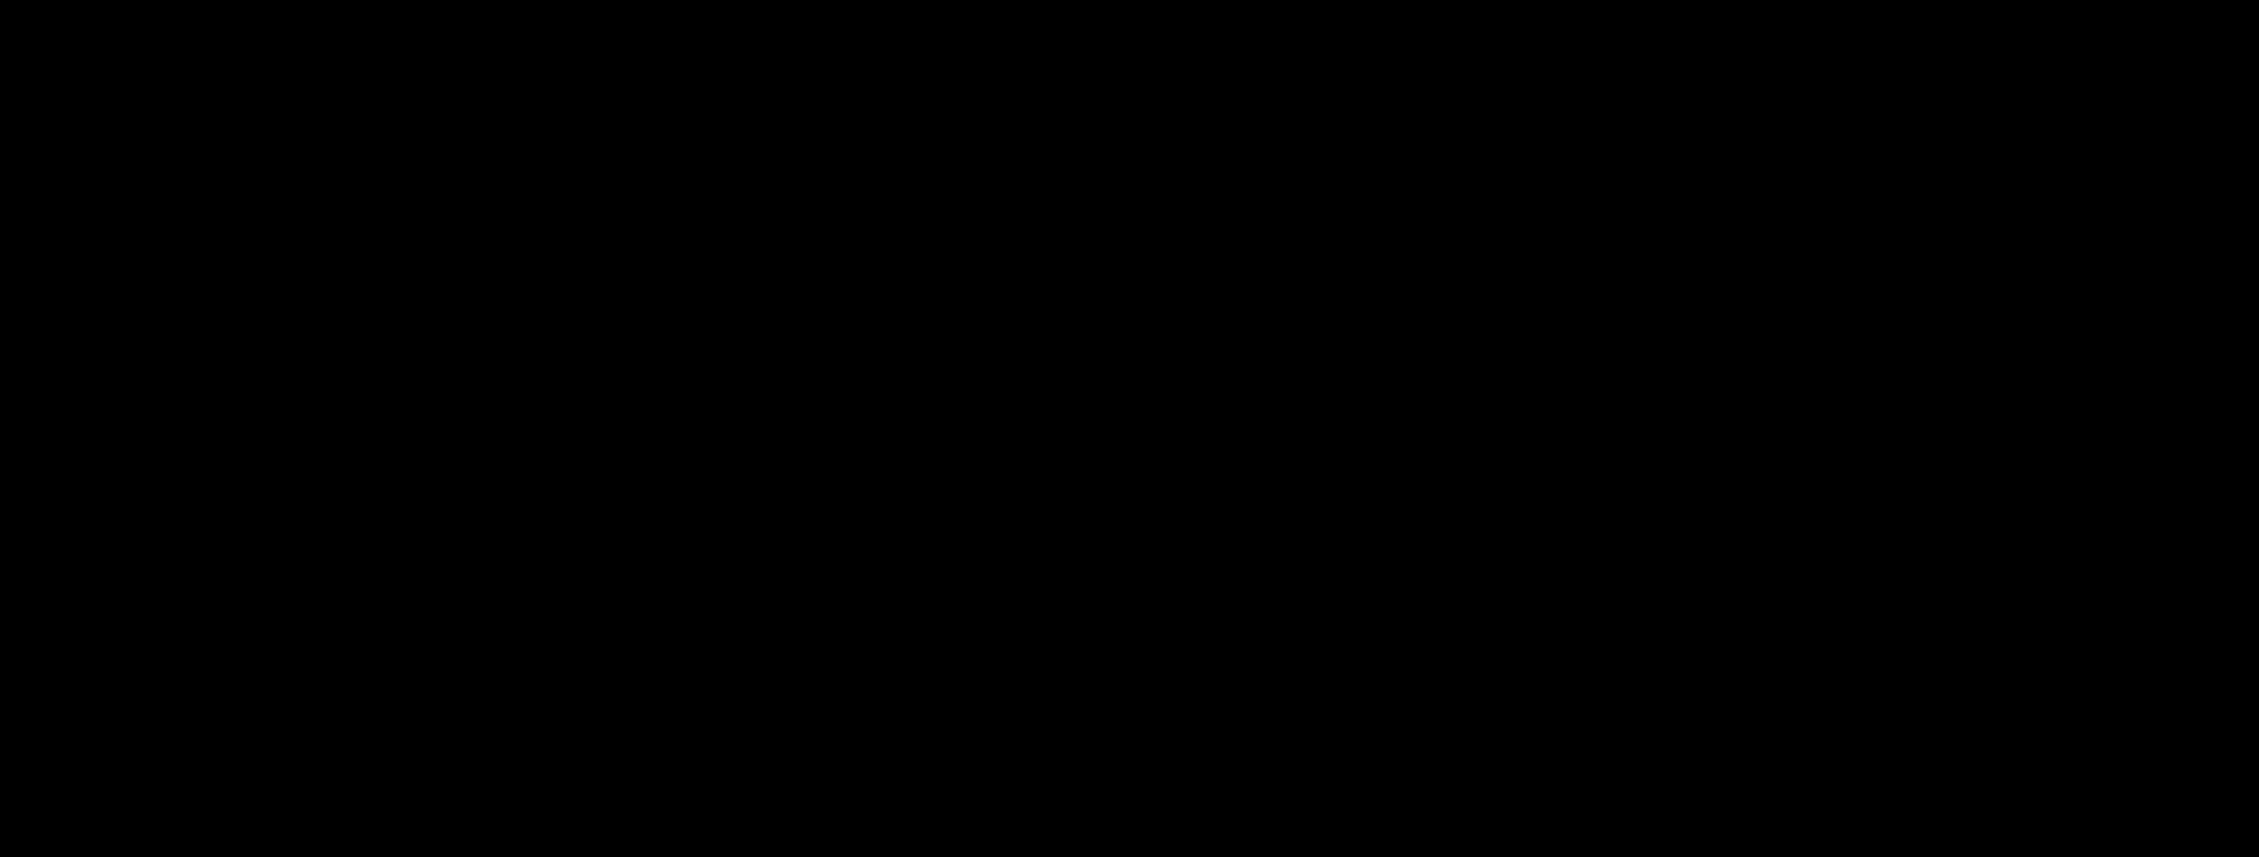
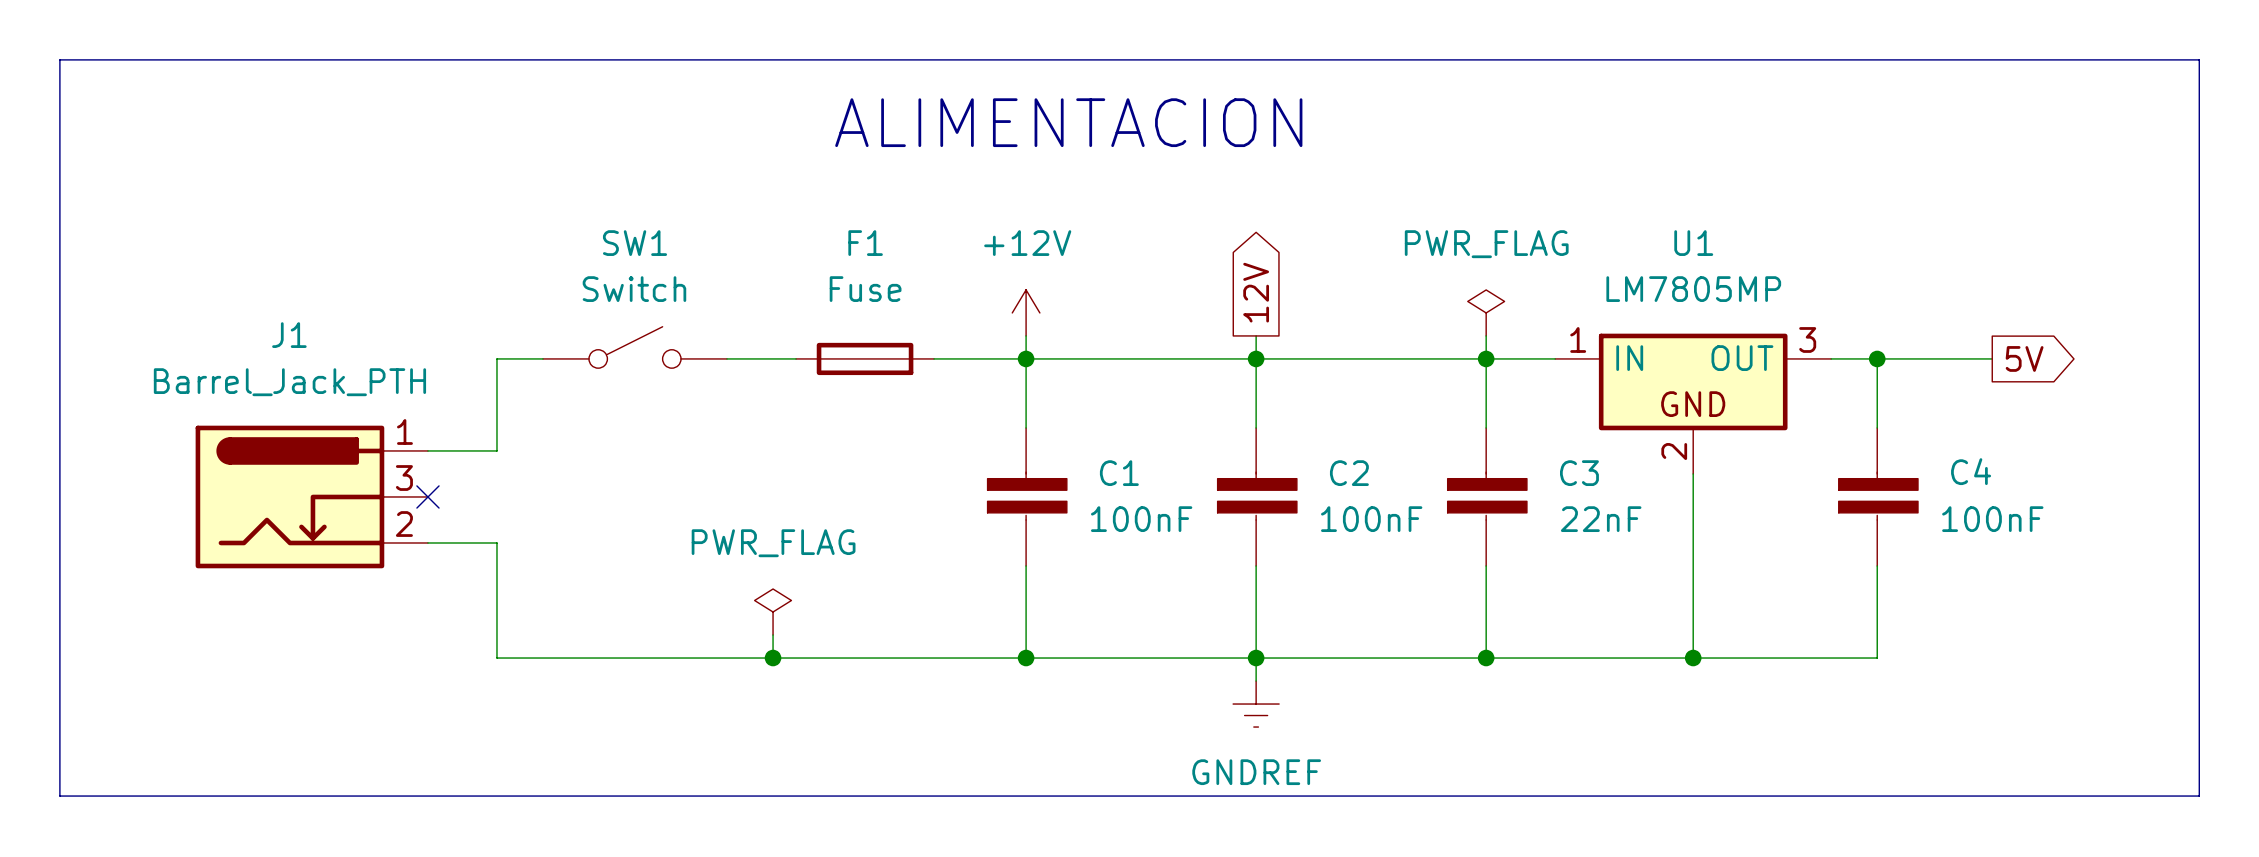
line: none -> (59, 59) (2199, 59) (2199, 796) (59, 796) (59, 59)
text: none -> ALIMENTACION (1068, 122)
global label: none -> 12V (1256, 292)
power symbol: none -> +12V (1026, 312)
power symbol: none -> PWR_FLAG (1486, 312)
wire: none -> (1026, 335) (1026, 427)
wire: none -> (1256, 335) (1256, 427)
wire: none -> (1486, 335) (1486, 427)
SW1: none -> Switch (635, 347)
wire: none -> (542, 358) (496, 358) (496, 450) (427, 450)
wire: none -> (727, 358) (796, 358)
F1: none -> Fuse (865, 358)
wire: none -> (934, 358) (1555, 358)
junction: none -> (1026, 358)
junction: none -> (1256, 358)
junction: none -> (1486, 358)
wire: none -> (1831, 358) (1992, 358)
wire: none -> (1877, 358) (1877, 427)
junction: none -> (1877, 358)
global label: none -> 5V (2024, 358)
U1: none -> LM7805MP (1693, 403)
wire: none -> (1693, 473) (1693, 658)
J1: none -> Barrel_Jack_PTH (311, 496)
no-connect mark: none -> (427, 496)
C1: none -> 100nF (1027, 496)
C2: none -> 100nF (1257, 496)
C3: none -> 22nF (1487, 496)
C4: none -> 100nF (1878, 496)
wire: none -> (427, 542) (496, 542) (496, 658) (1877, 658) (1877, 566)
wire: none -> (1026, 566) (1026, 658)
wire: none -> (1256, 566) (1256, 681)
wire: none -> (1486, 566) (1486, 658)
power symbol: none -> PWR_FLAG (773, 612)
wire: none -> (773, 635) (773, 658)
junction: none -> (773, 658)
junction: none -> (1026, 658)
junction: none -> (1256, 658)
junction: none -> (1486, 658)
junction: none -> (1693, 658)
power symbol: none -> GNDREF (1256, 704)

